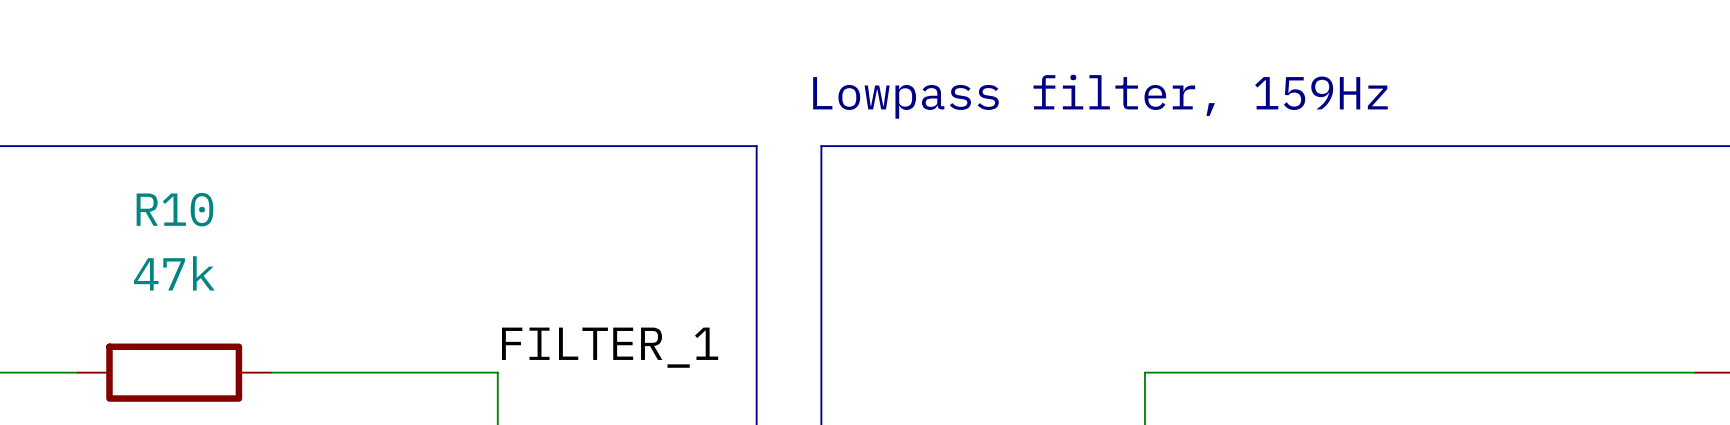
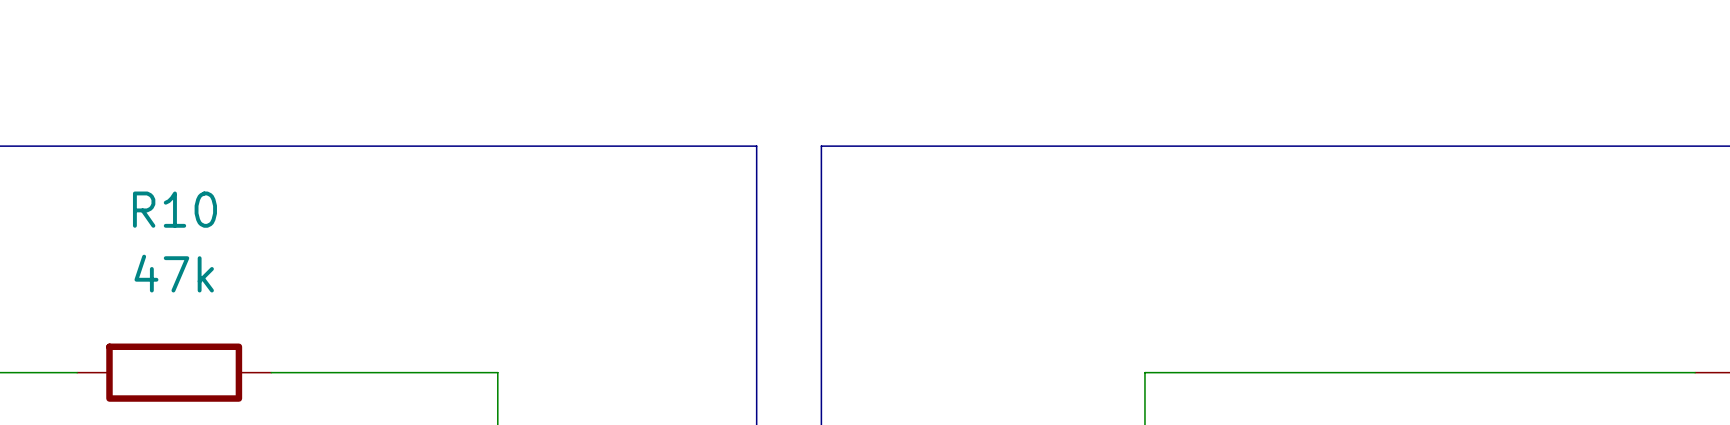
text: Lowpass filter, 159Hz (1100, 96) -> none
label: FILTER_1 (610, 347) -> none

